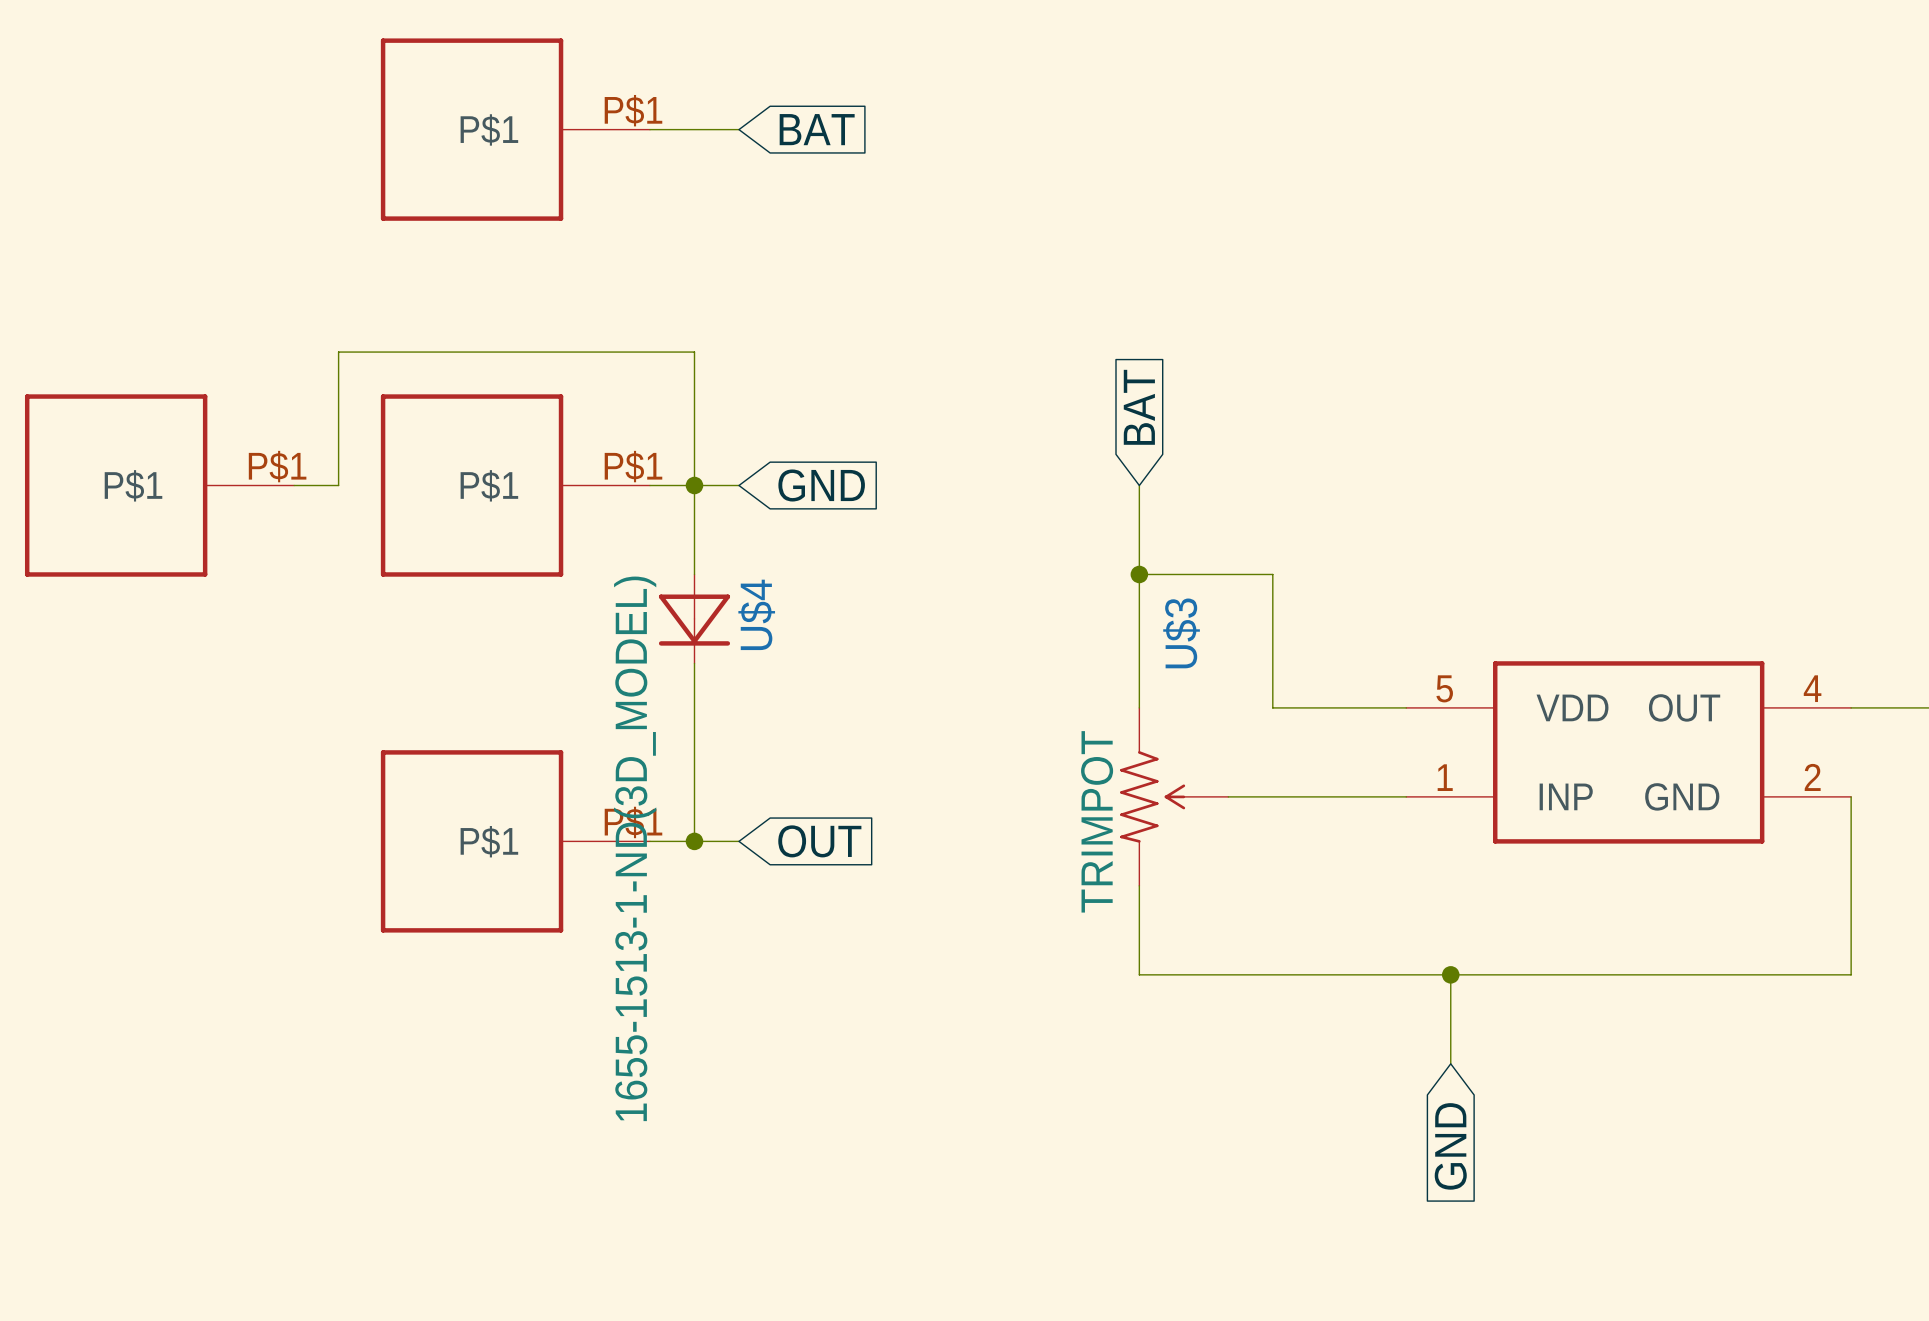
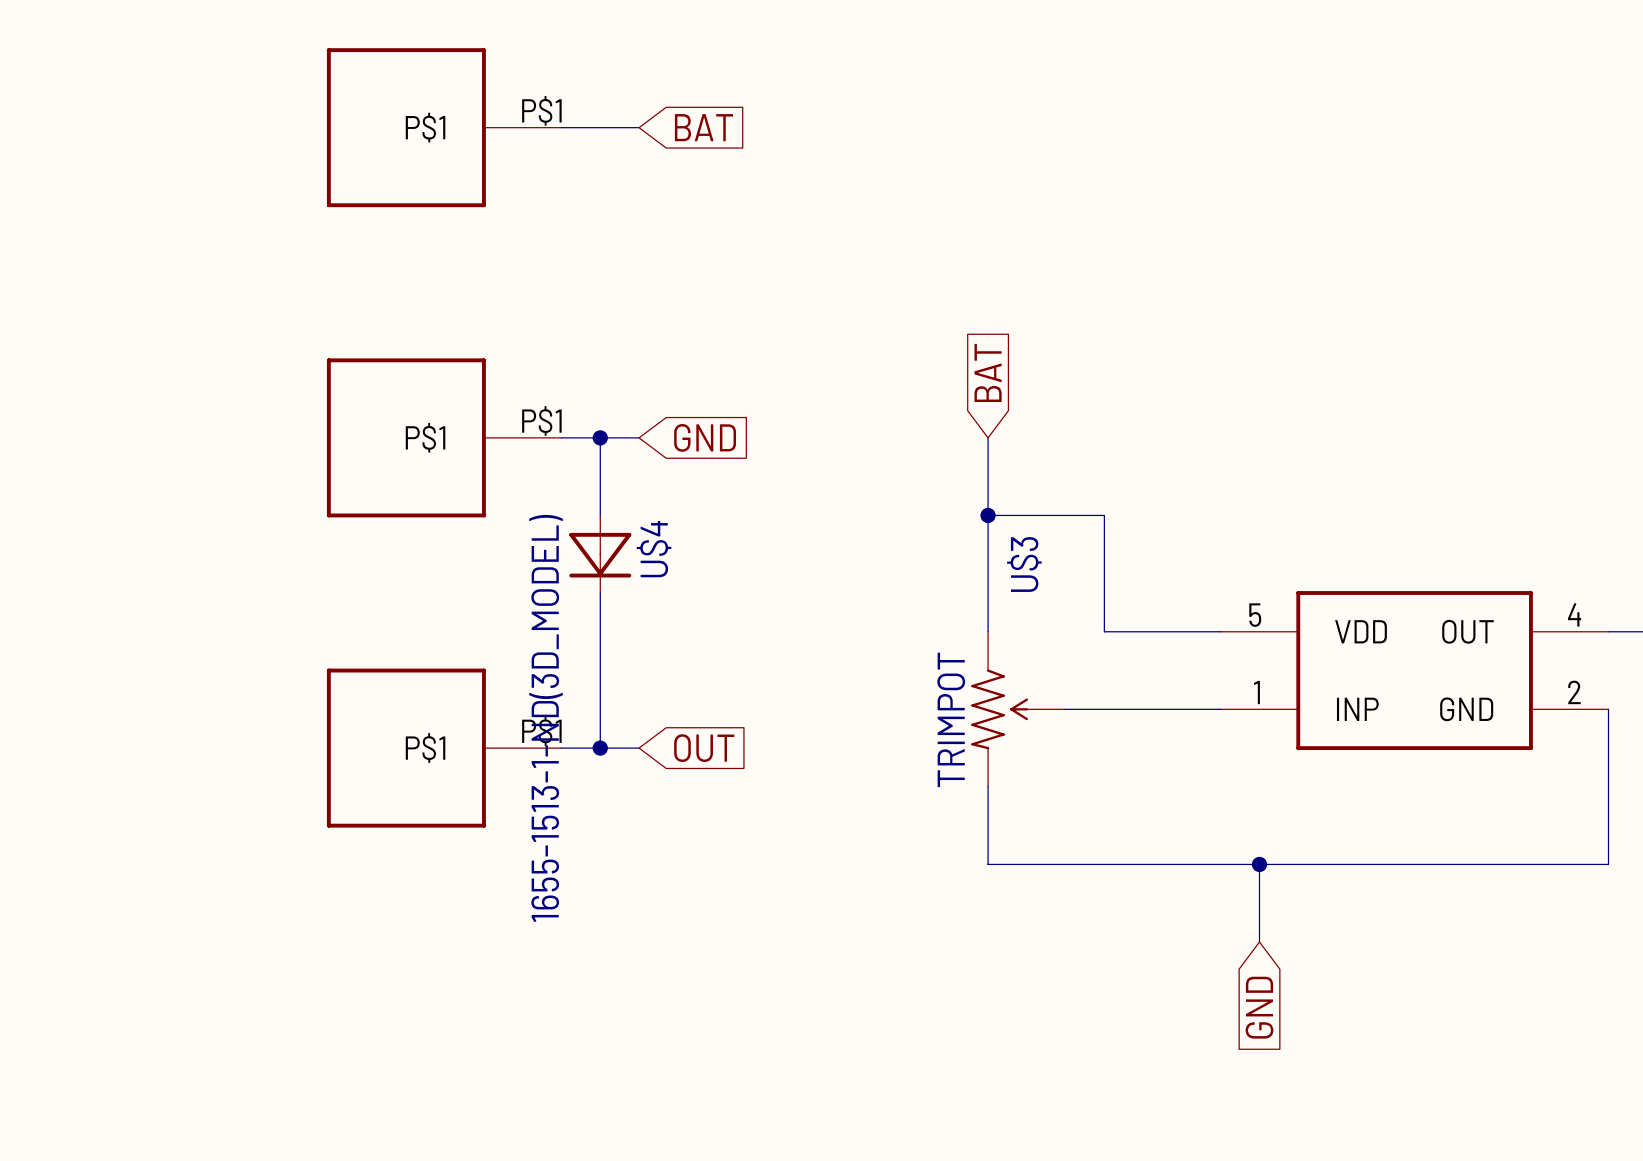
part: (159, 485) -> none
wire: (294, 485) (338, 485) (338, 352) (694, 352) (694, 485) -> none

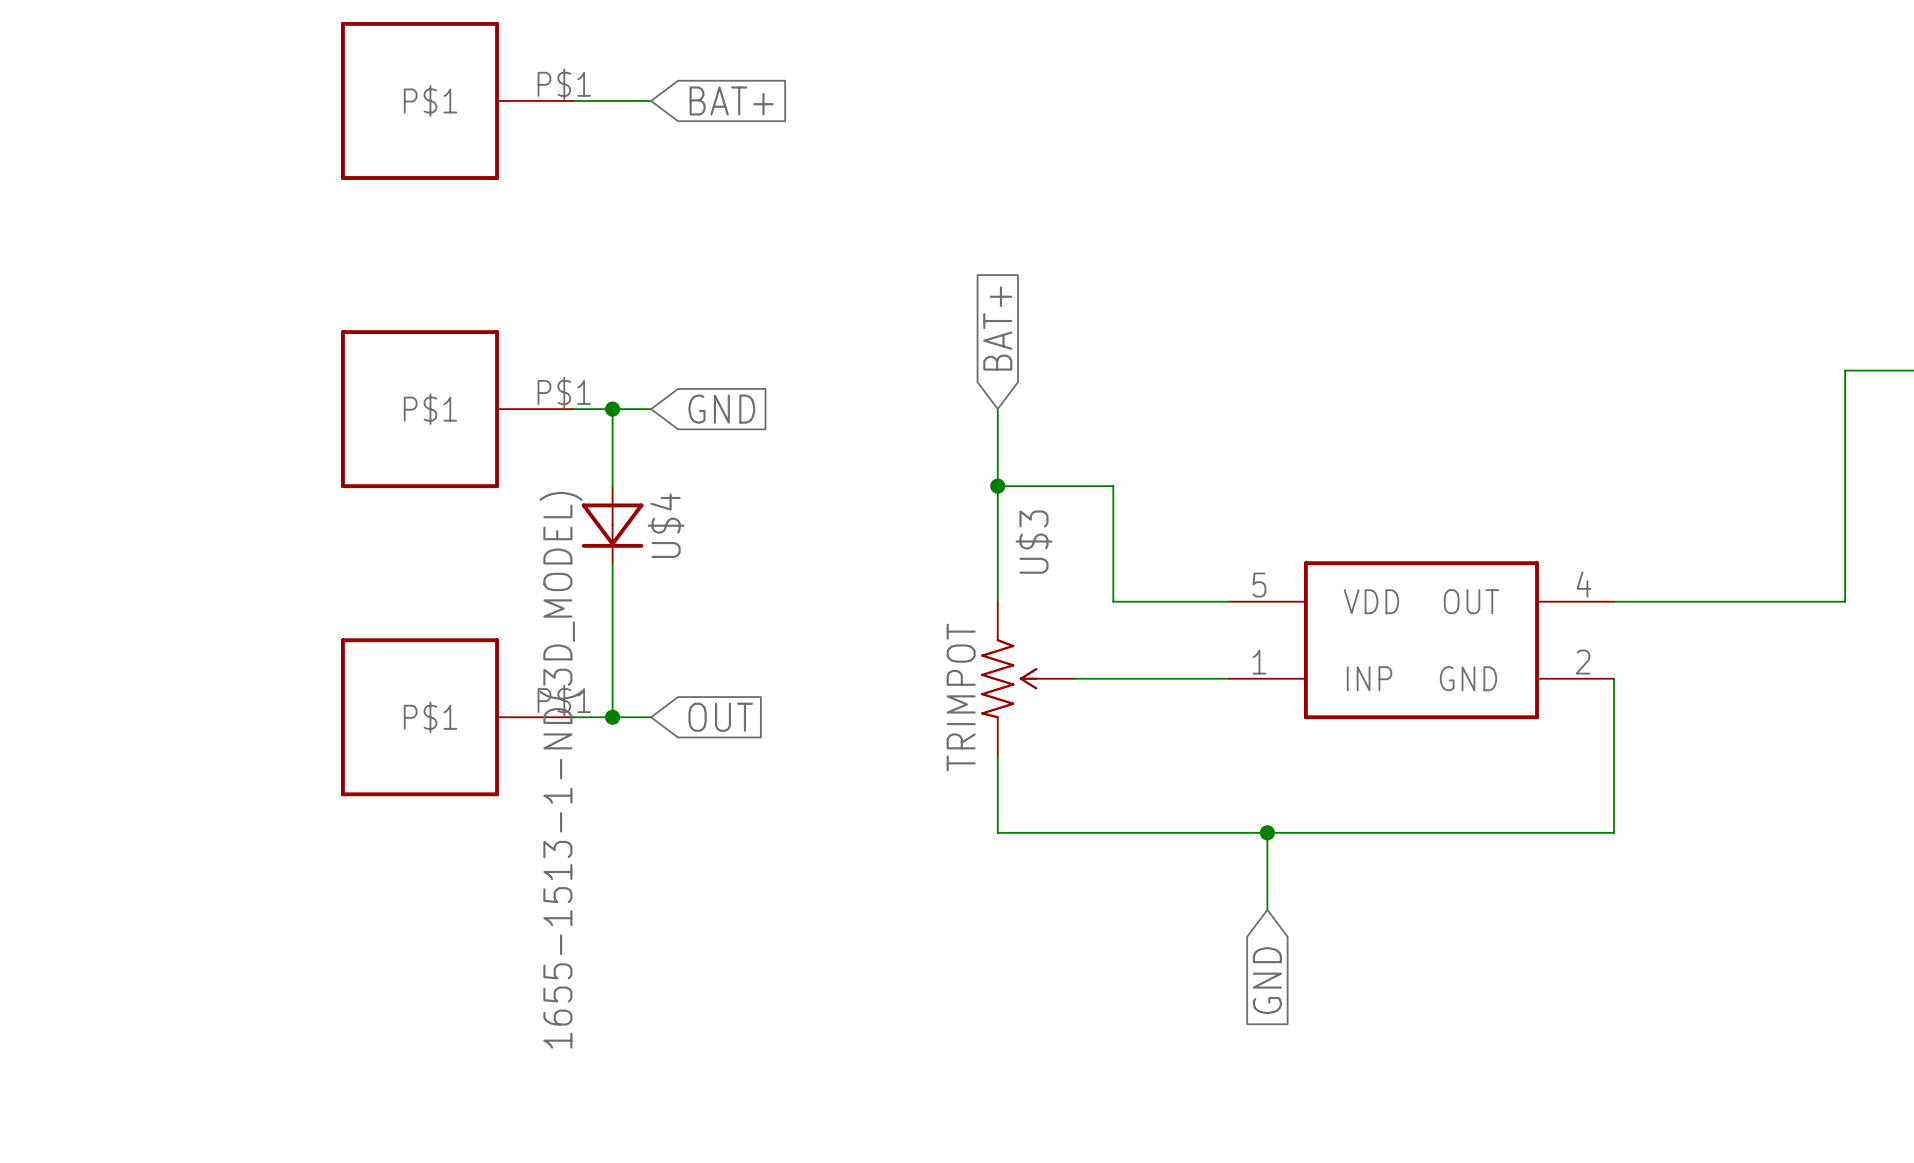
global label: BAT (703, 127) -> BAT+ (731, 100)
global label: BAT (988, 372) -> BAT+ (997, 328)

